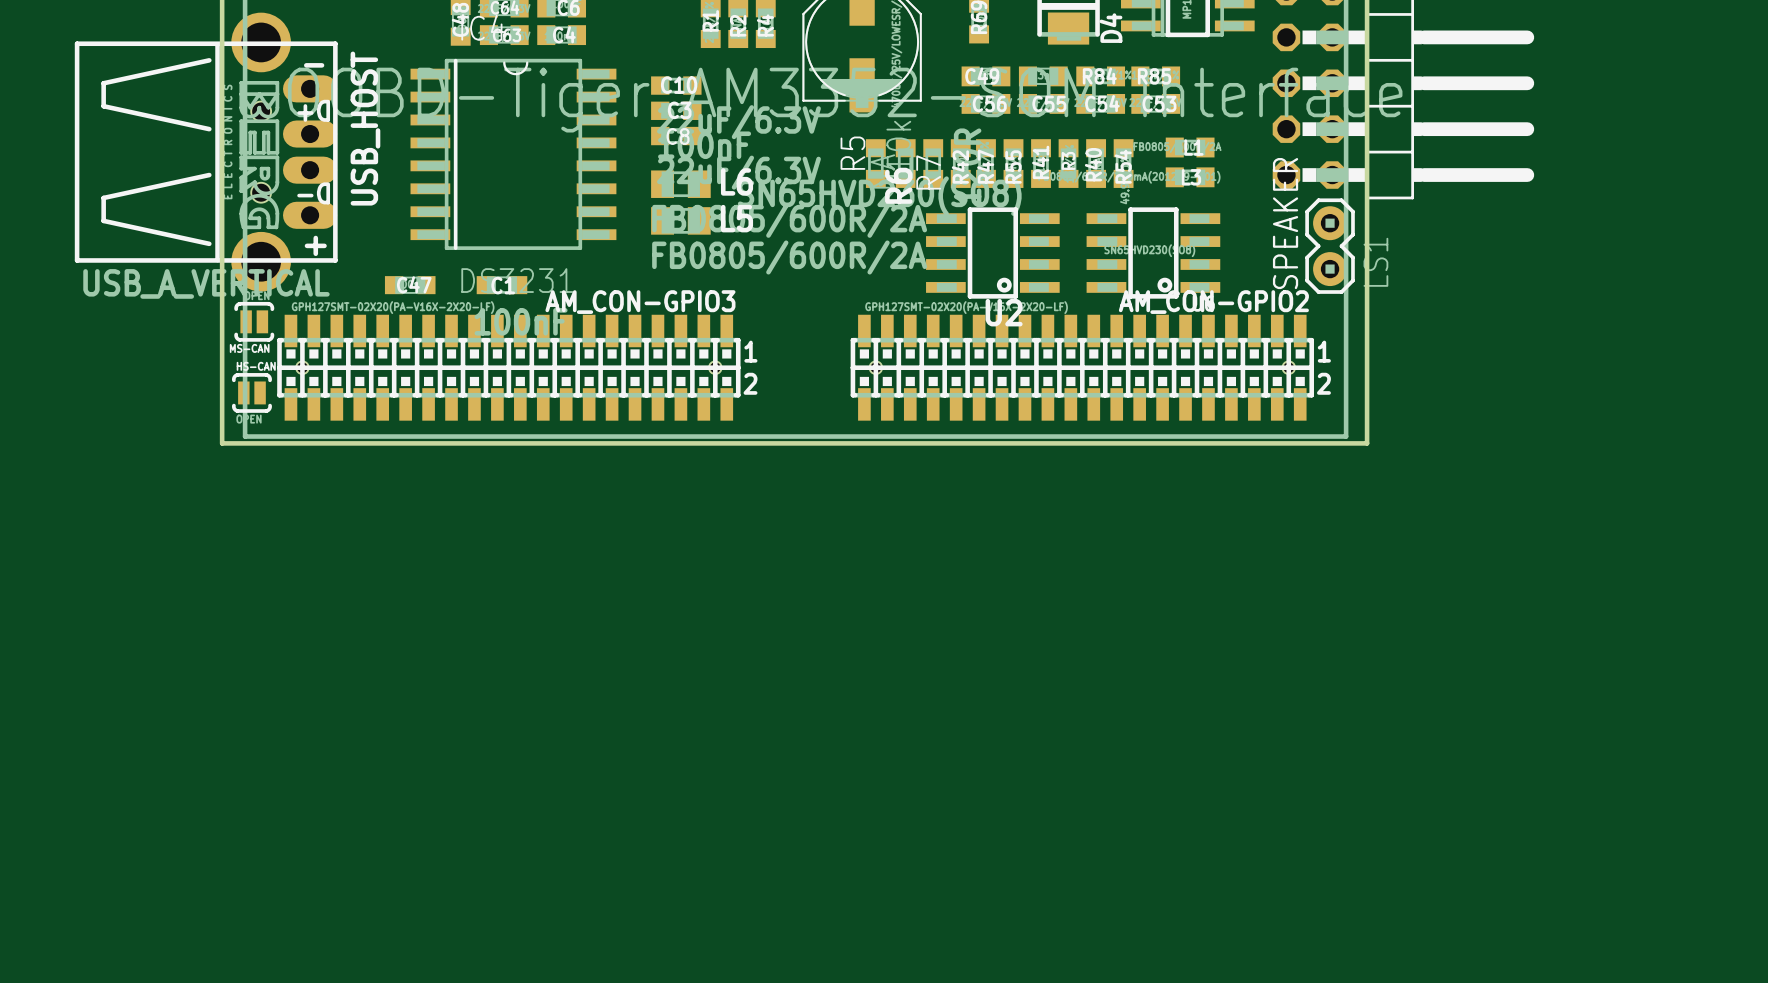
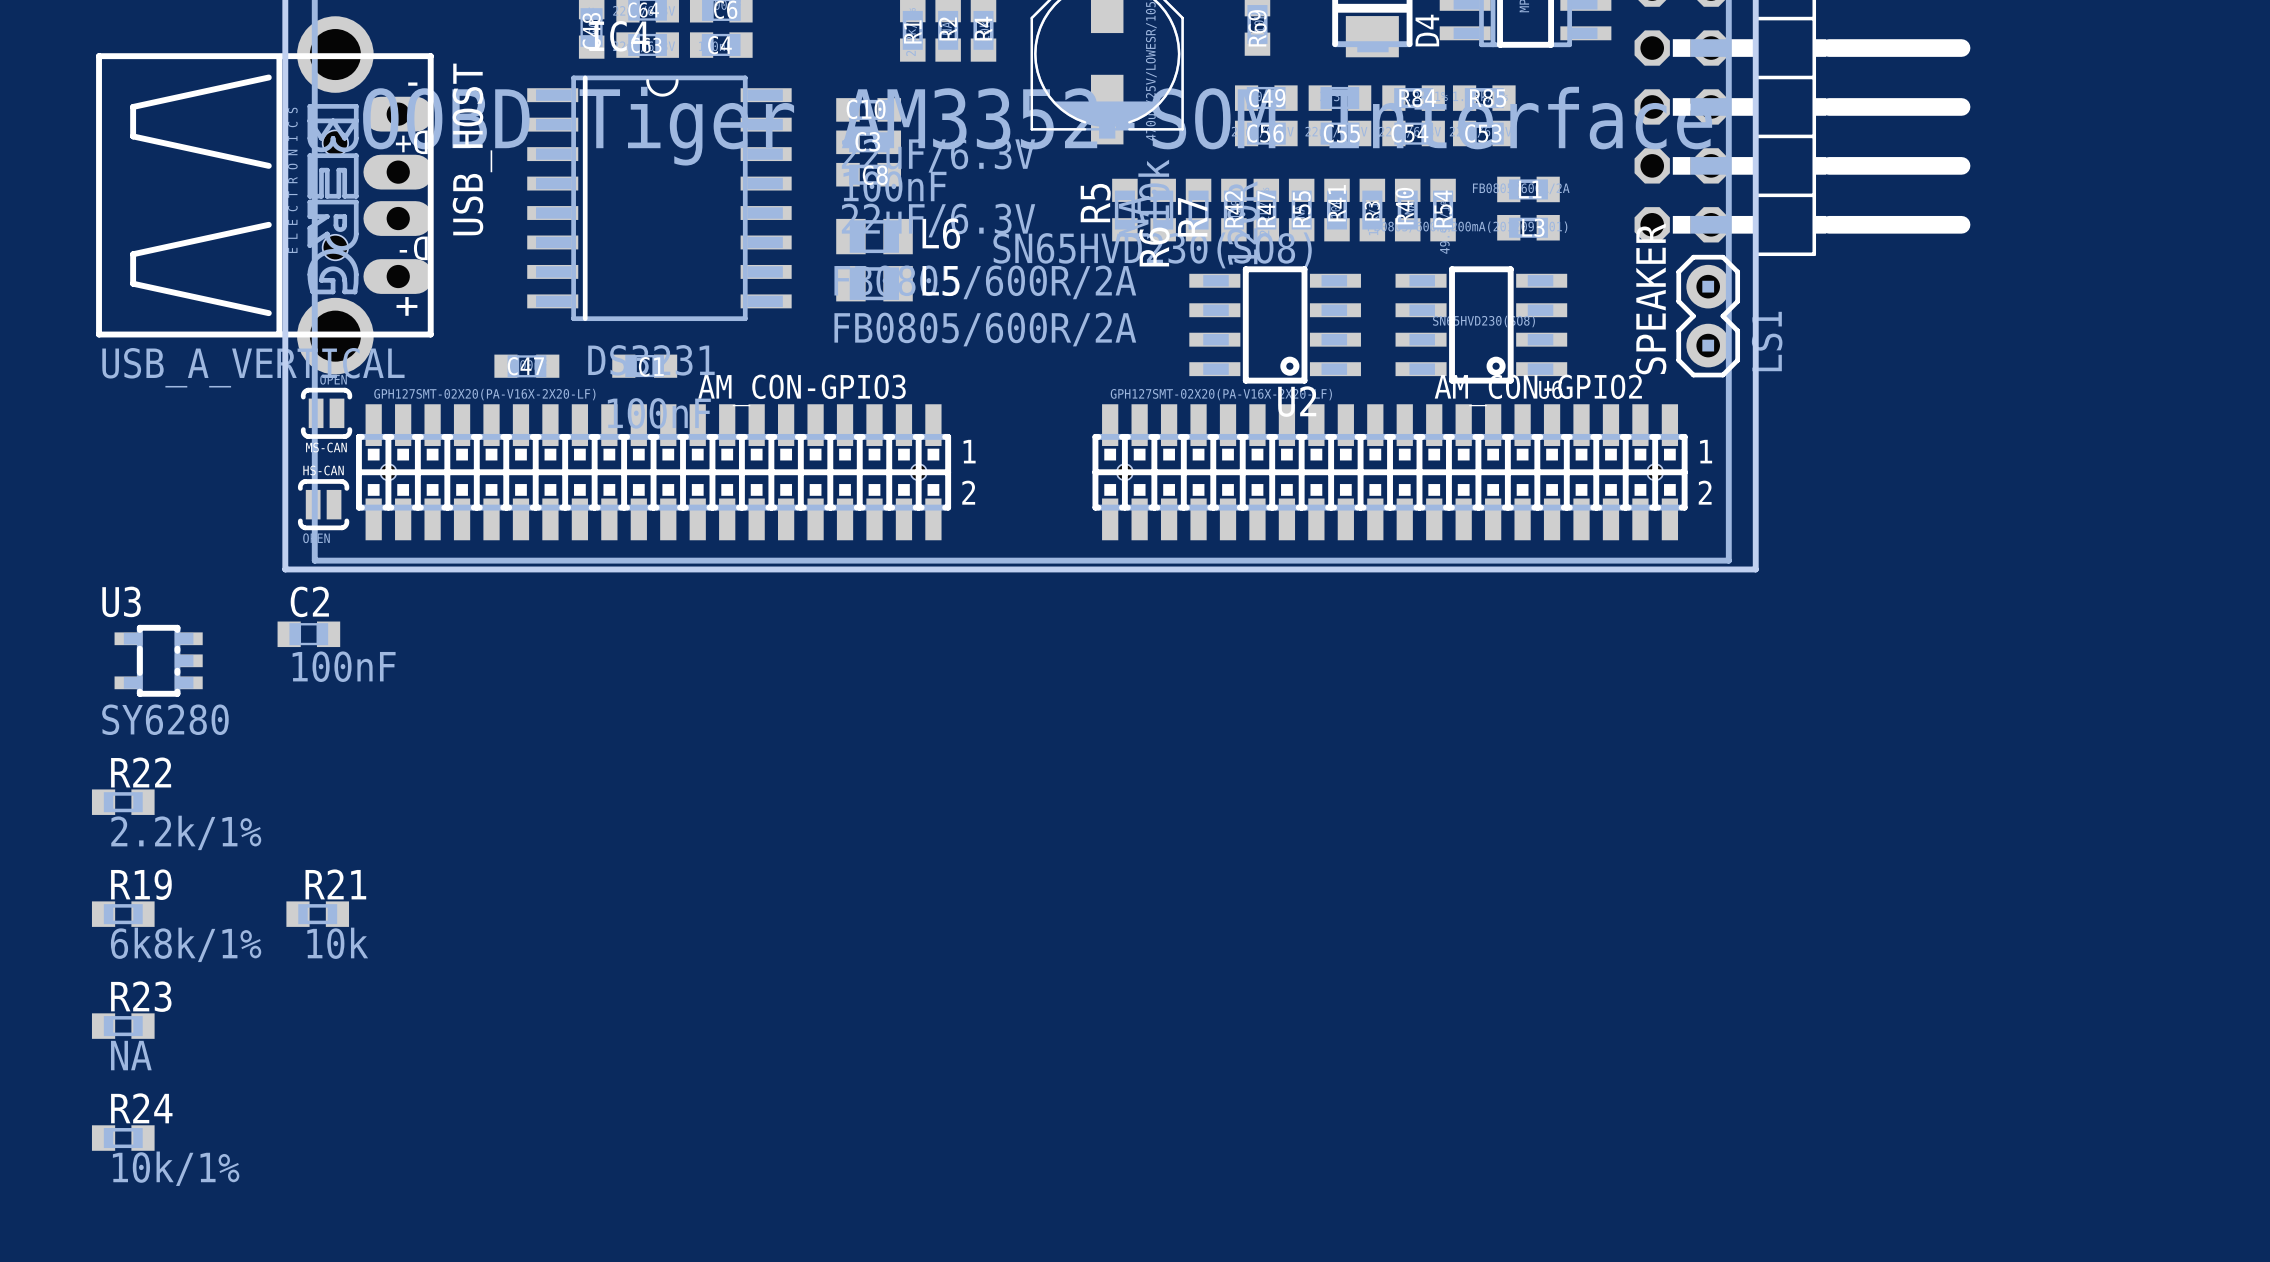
C2: none -> 100nF (308, 634)
U3: none -> SY6280 (158, 660)
R22: none -> 2.2k/1% (123, 802)
R19: none -> 6k8k/1% (123, 914)
R21: none -> 10k (317, 914)
R23: none -> NA (123, 1026)
R24: none -> 10k/1% (123, 1138)

